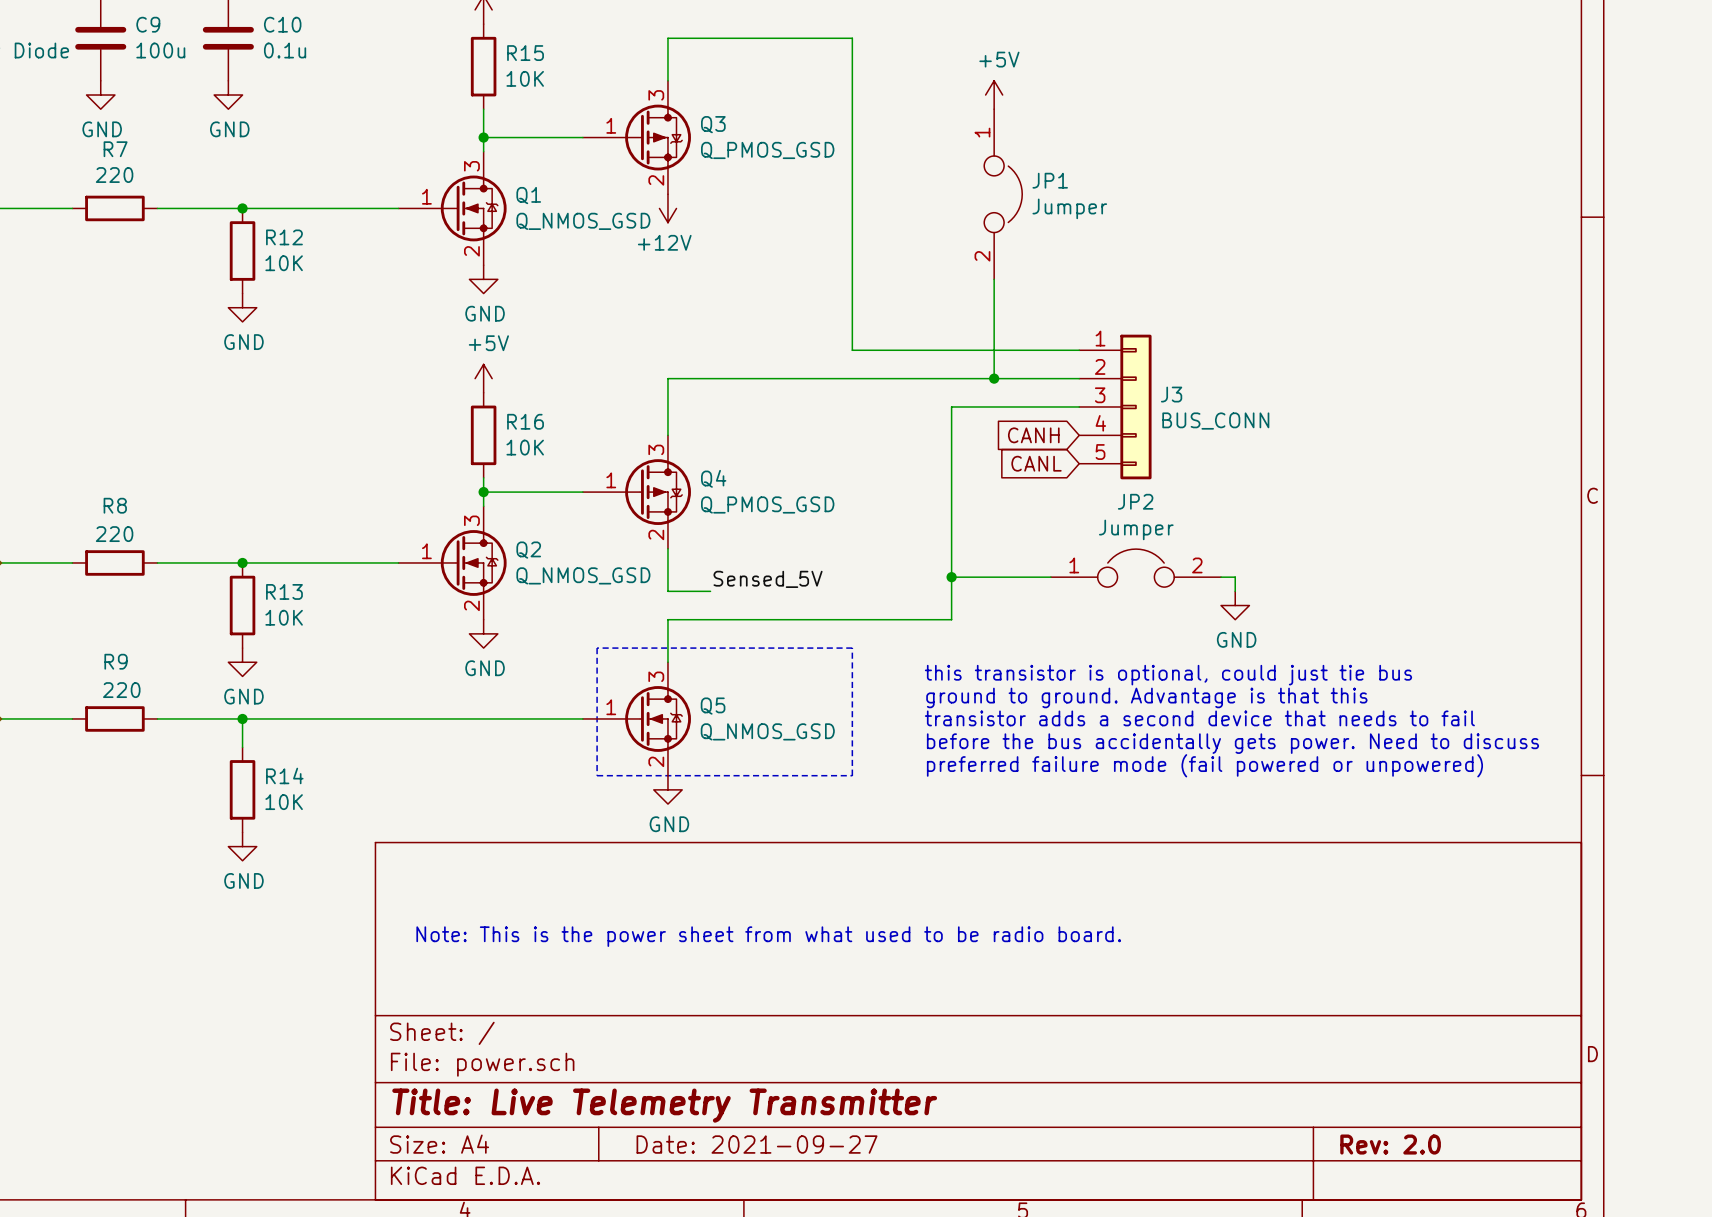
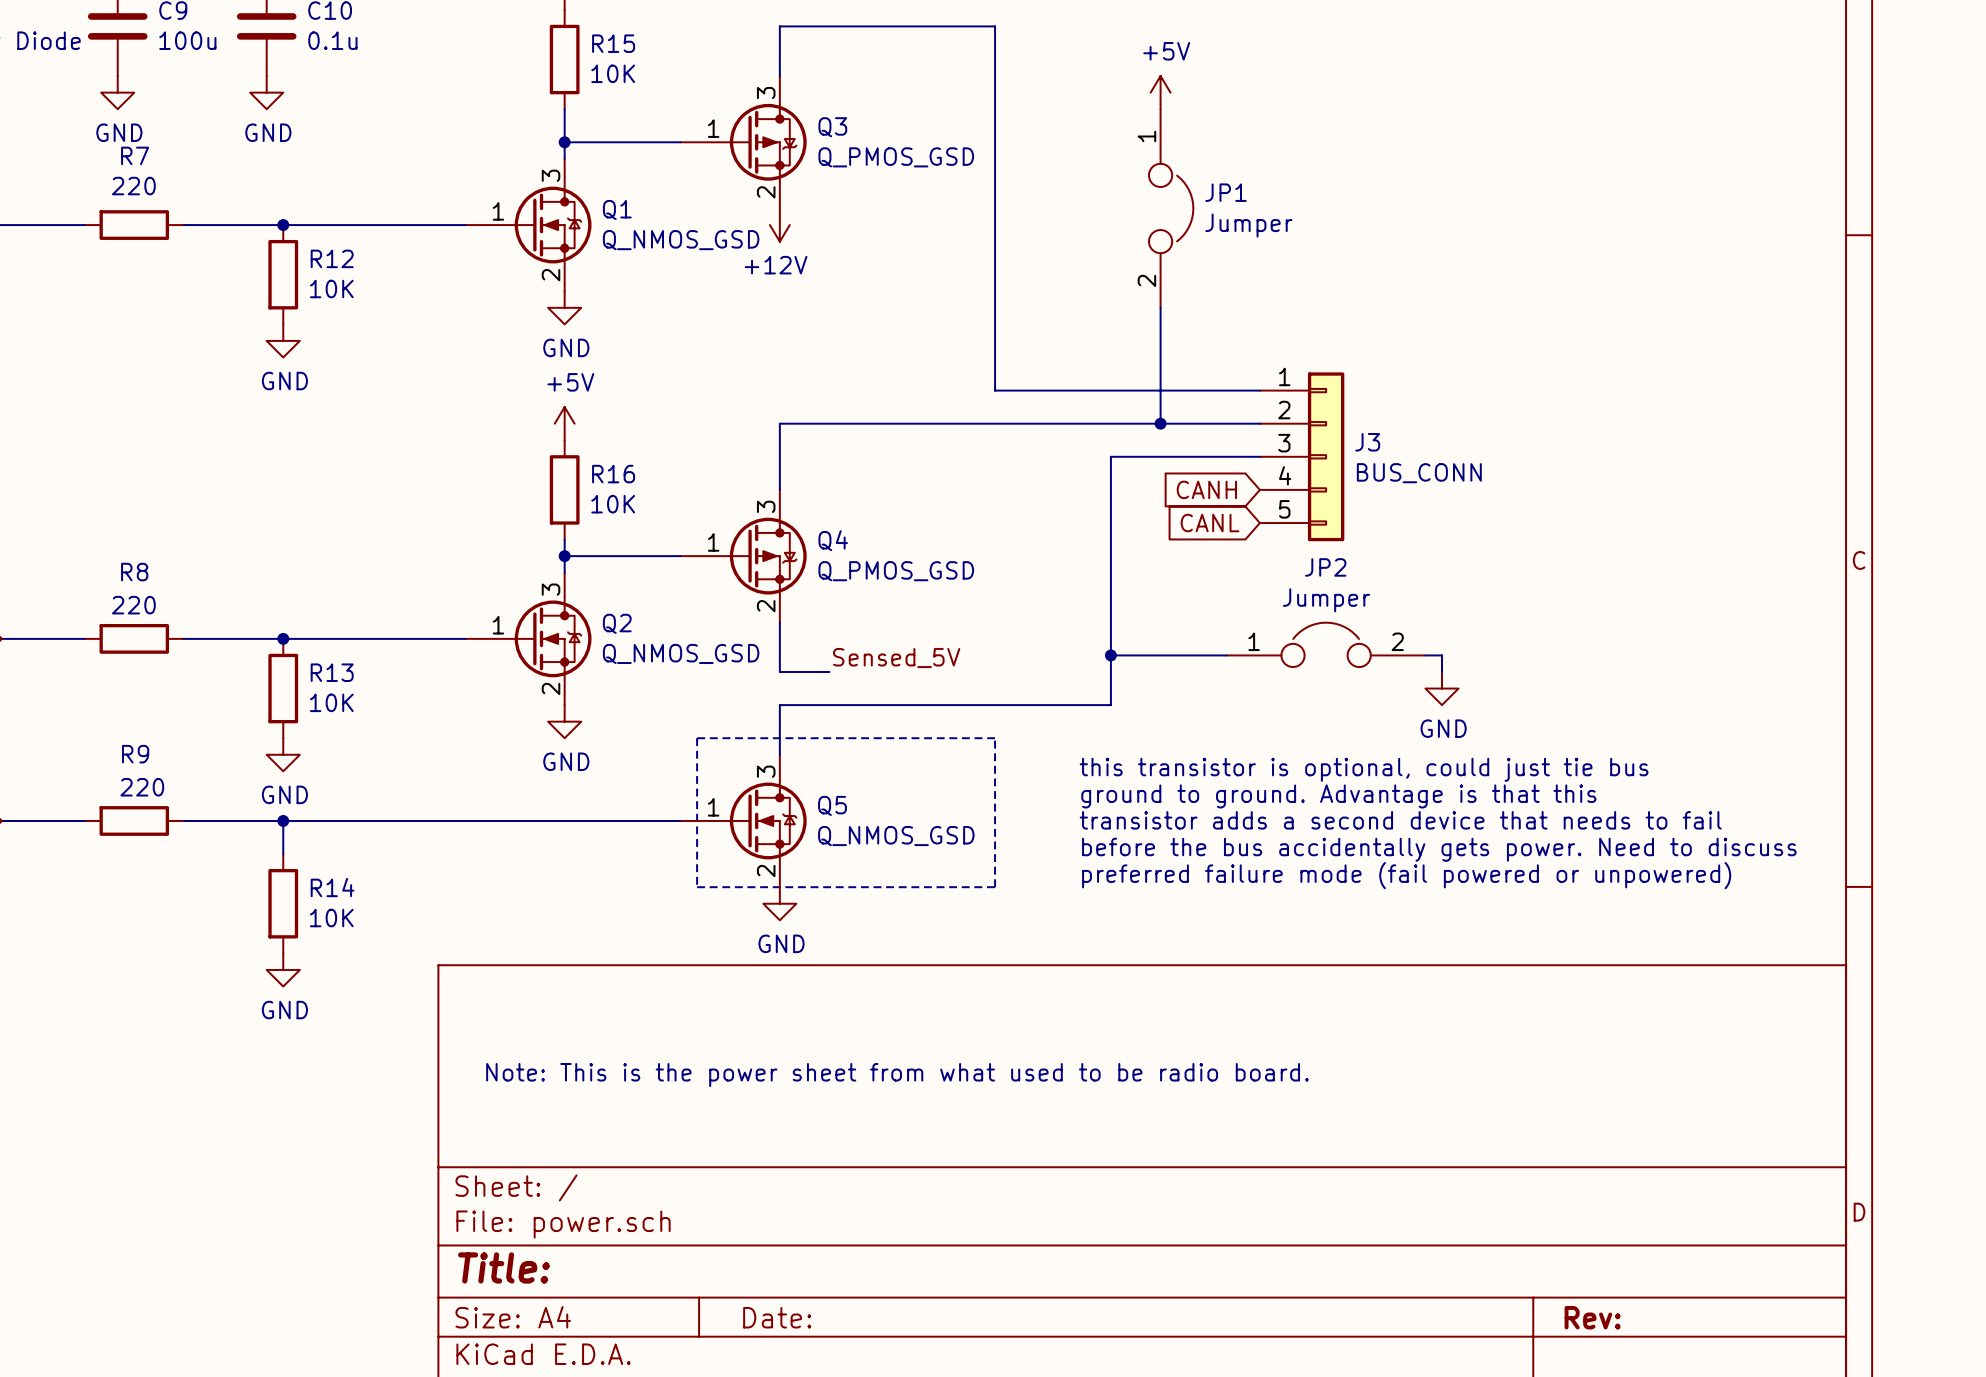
title block: Title: Live Telemetry Transmitter (664, 1105) -> Title: (503, 1267)
title block: Date: 2021-09-27 (757, 1144) -> Date: (777, 1317)
title block: Rev: 2.0 (1390, 1144) -> Rev: (1592, 1317)

